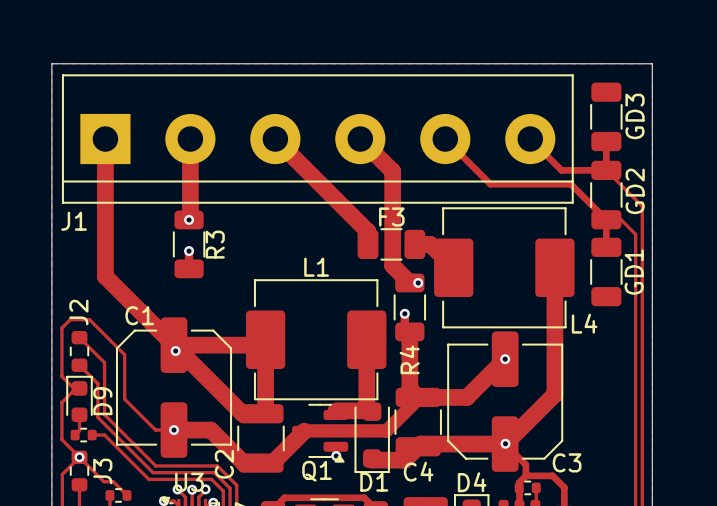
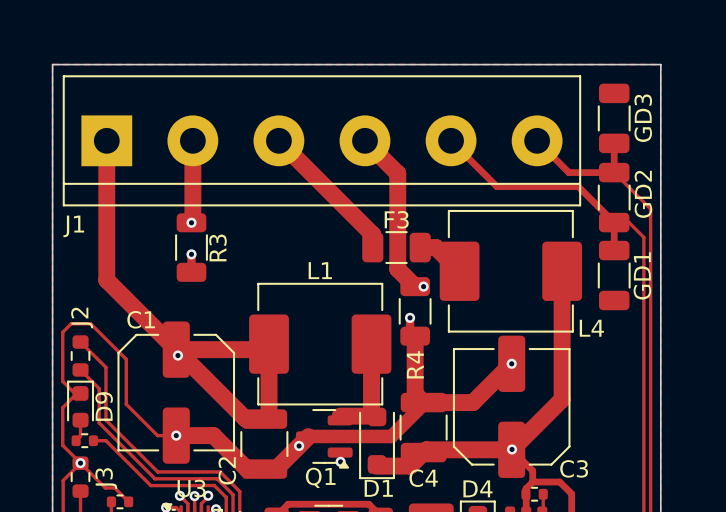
via: none -> (299, 445)

